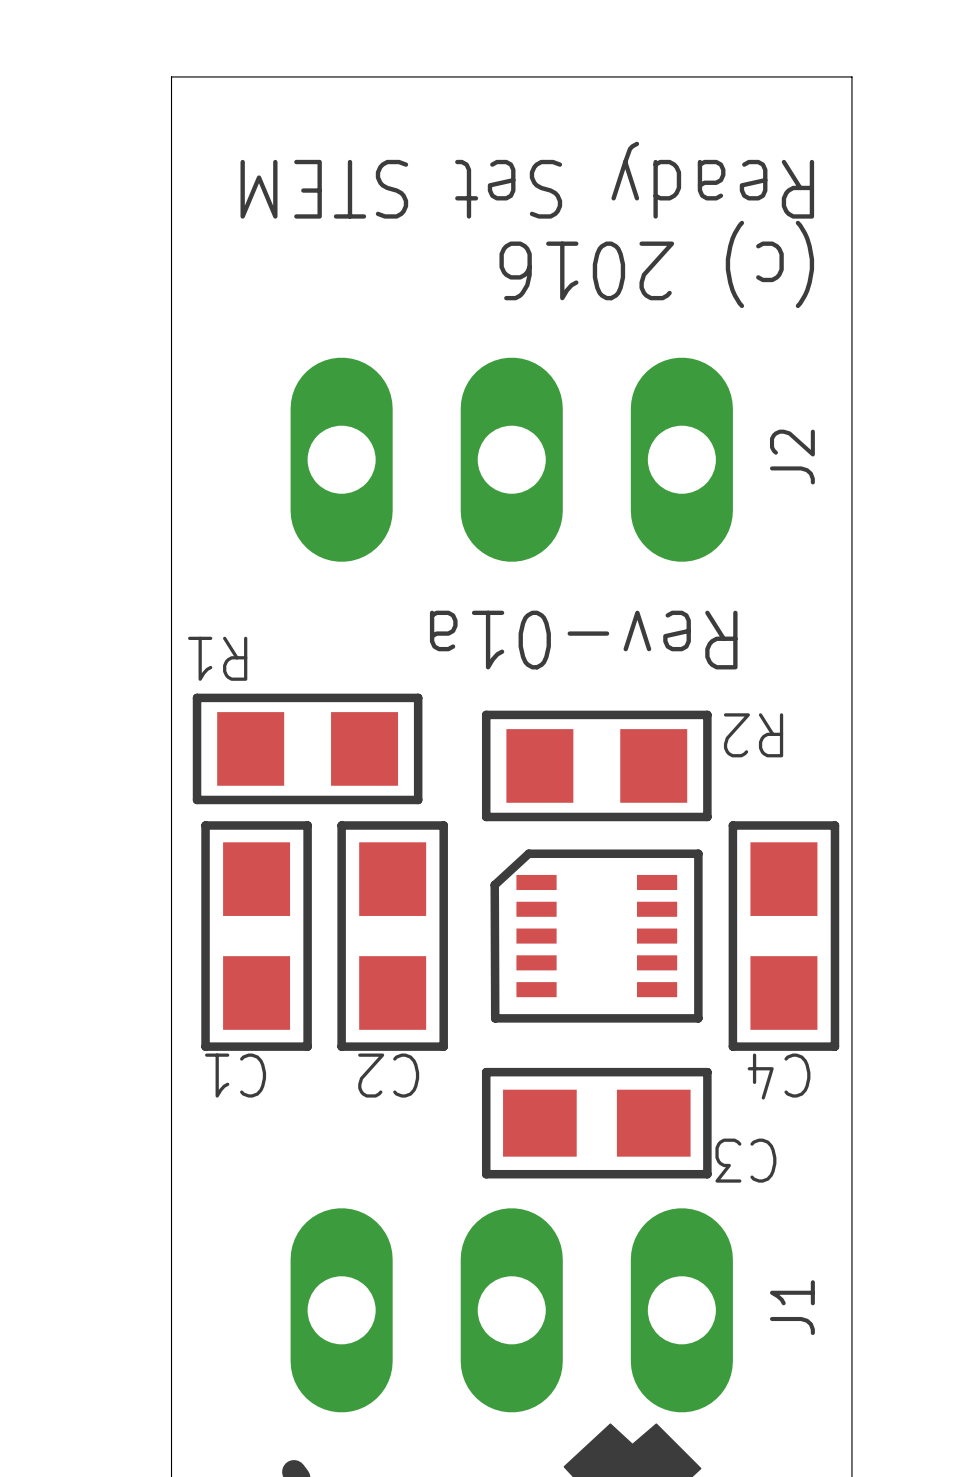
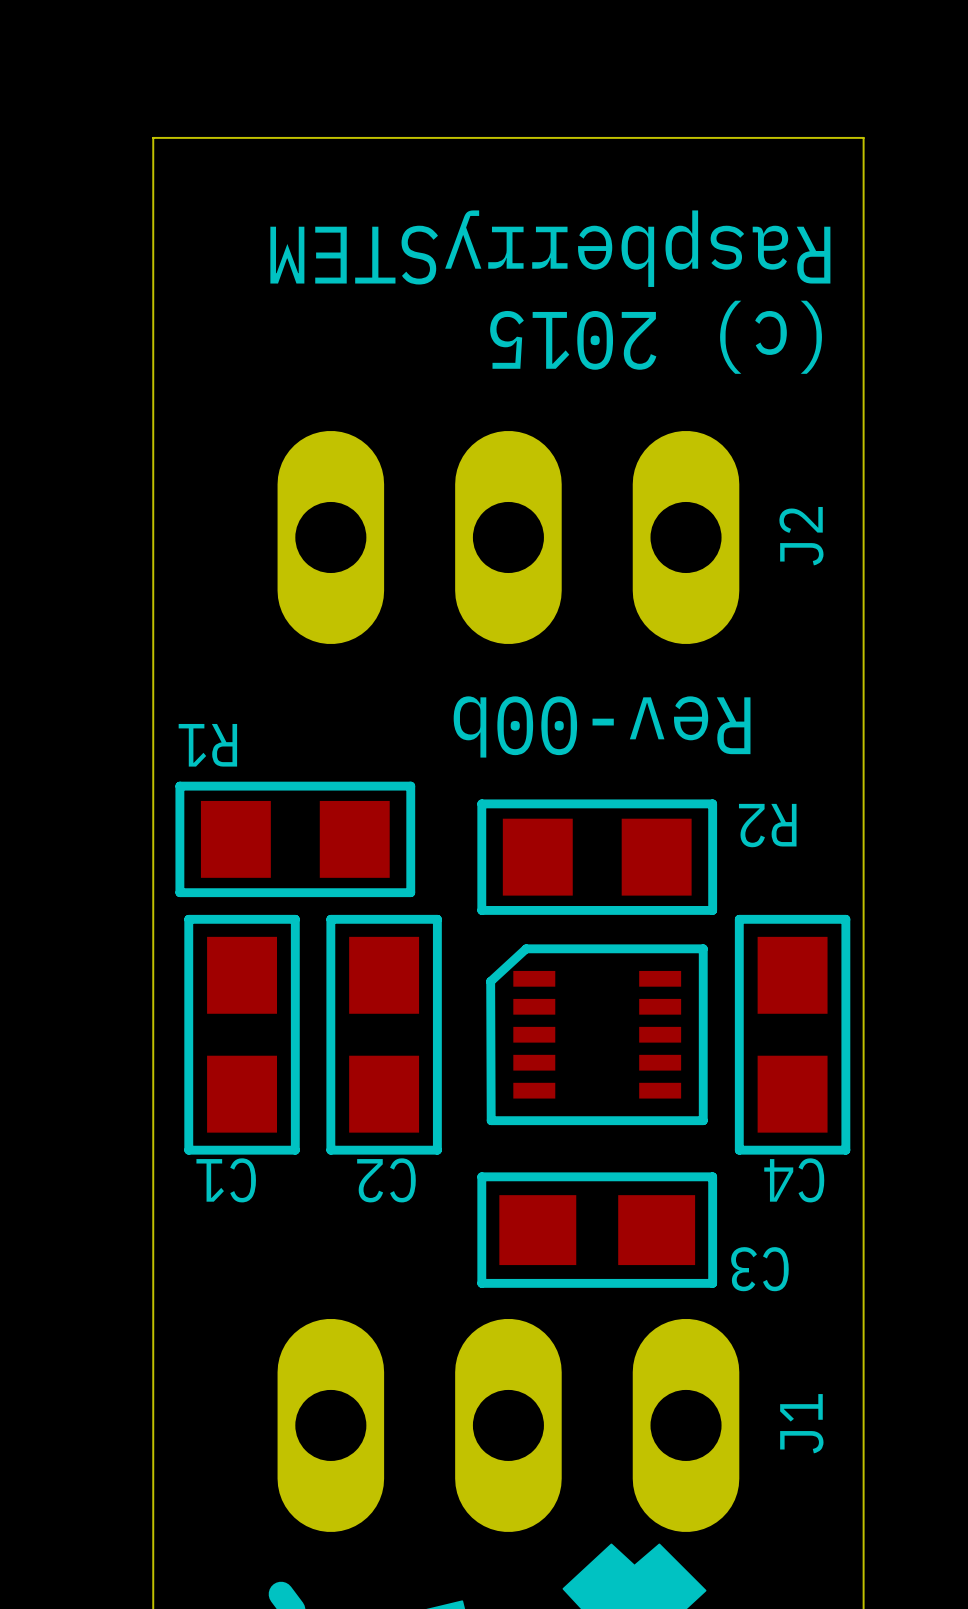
text: Ready Set STEM (527, 180) -> RaspberrySTEM (550, 248)
text: (c) 2016 (656, 264) -> (c) 2015 (656, 337)
text: Rev-01a (583, 640) -> Rev-00b (602, 726)

